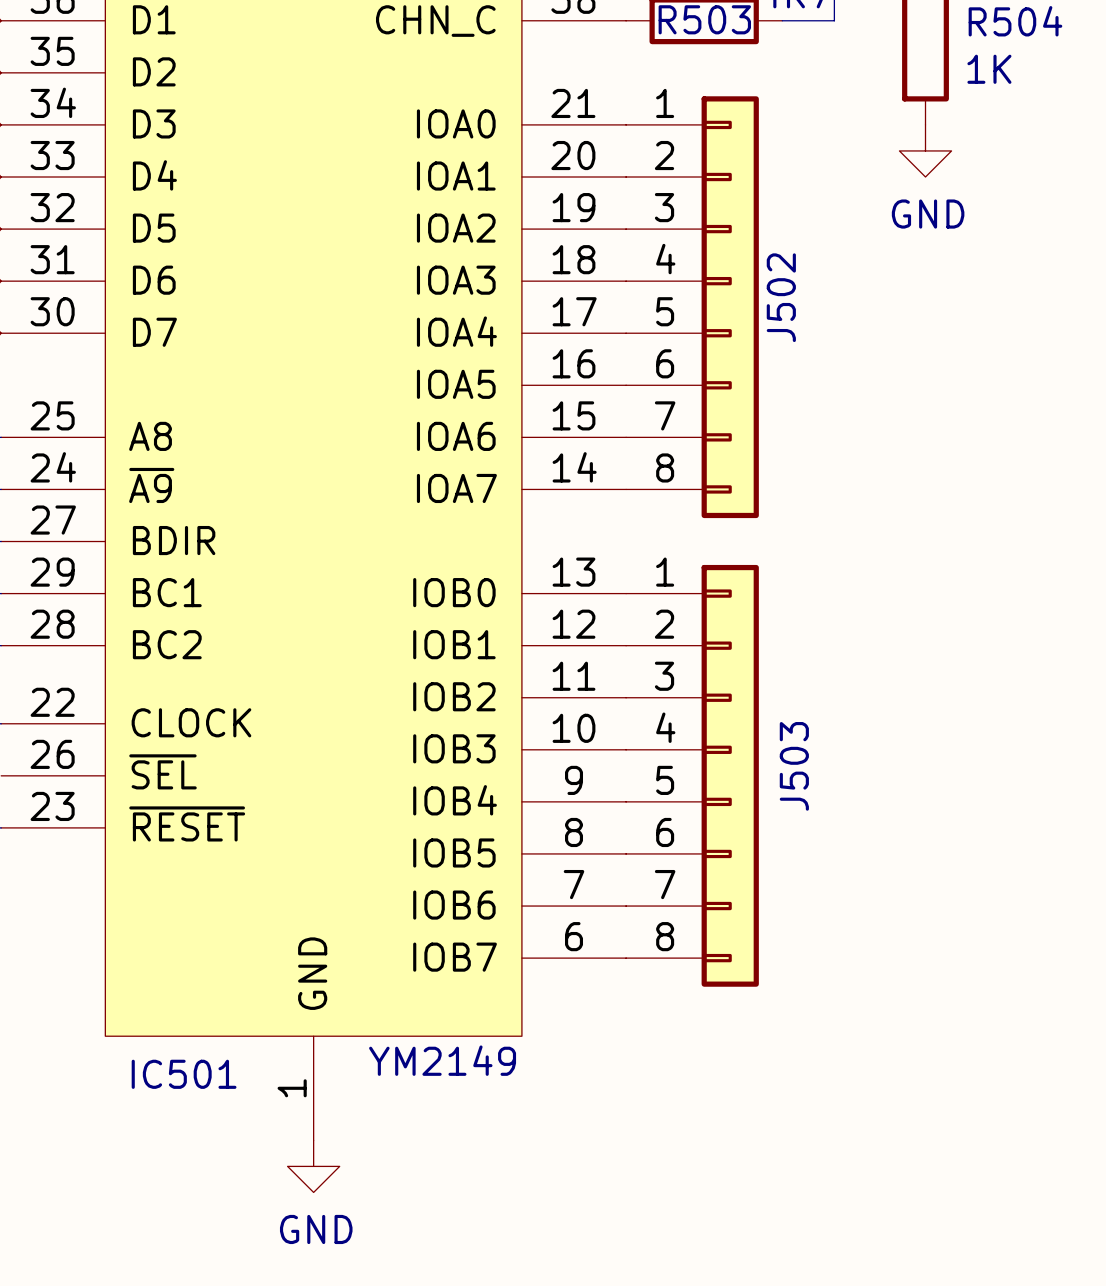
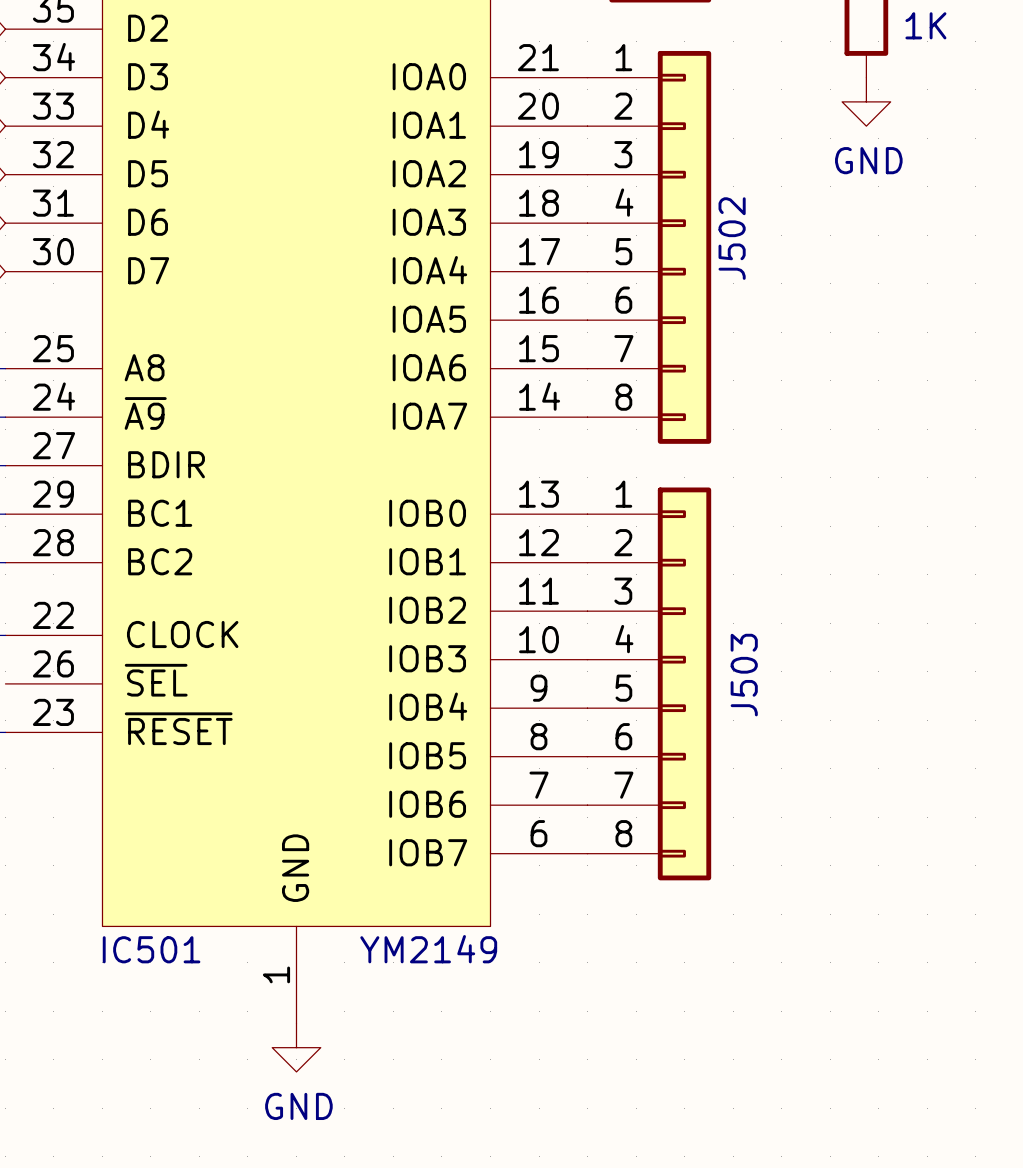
IC501 value position: YM2149 (442, 1060) -> YM2149 (428, 949)
IC501 name position: IC501 (184, 1074) -> IC501 (151, 949)

